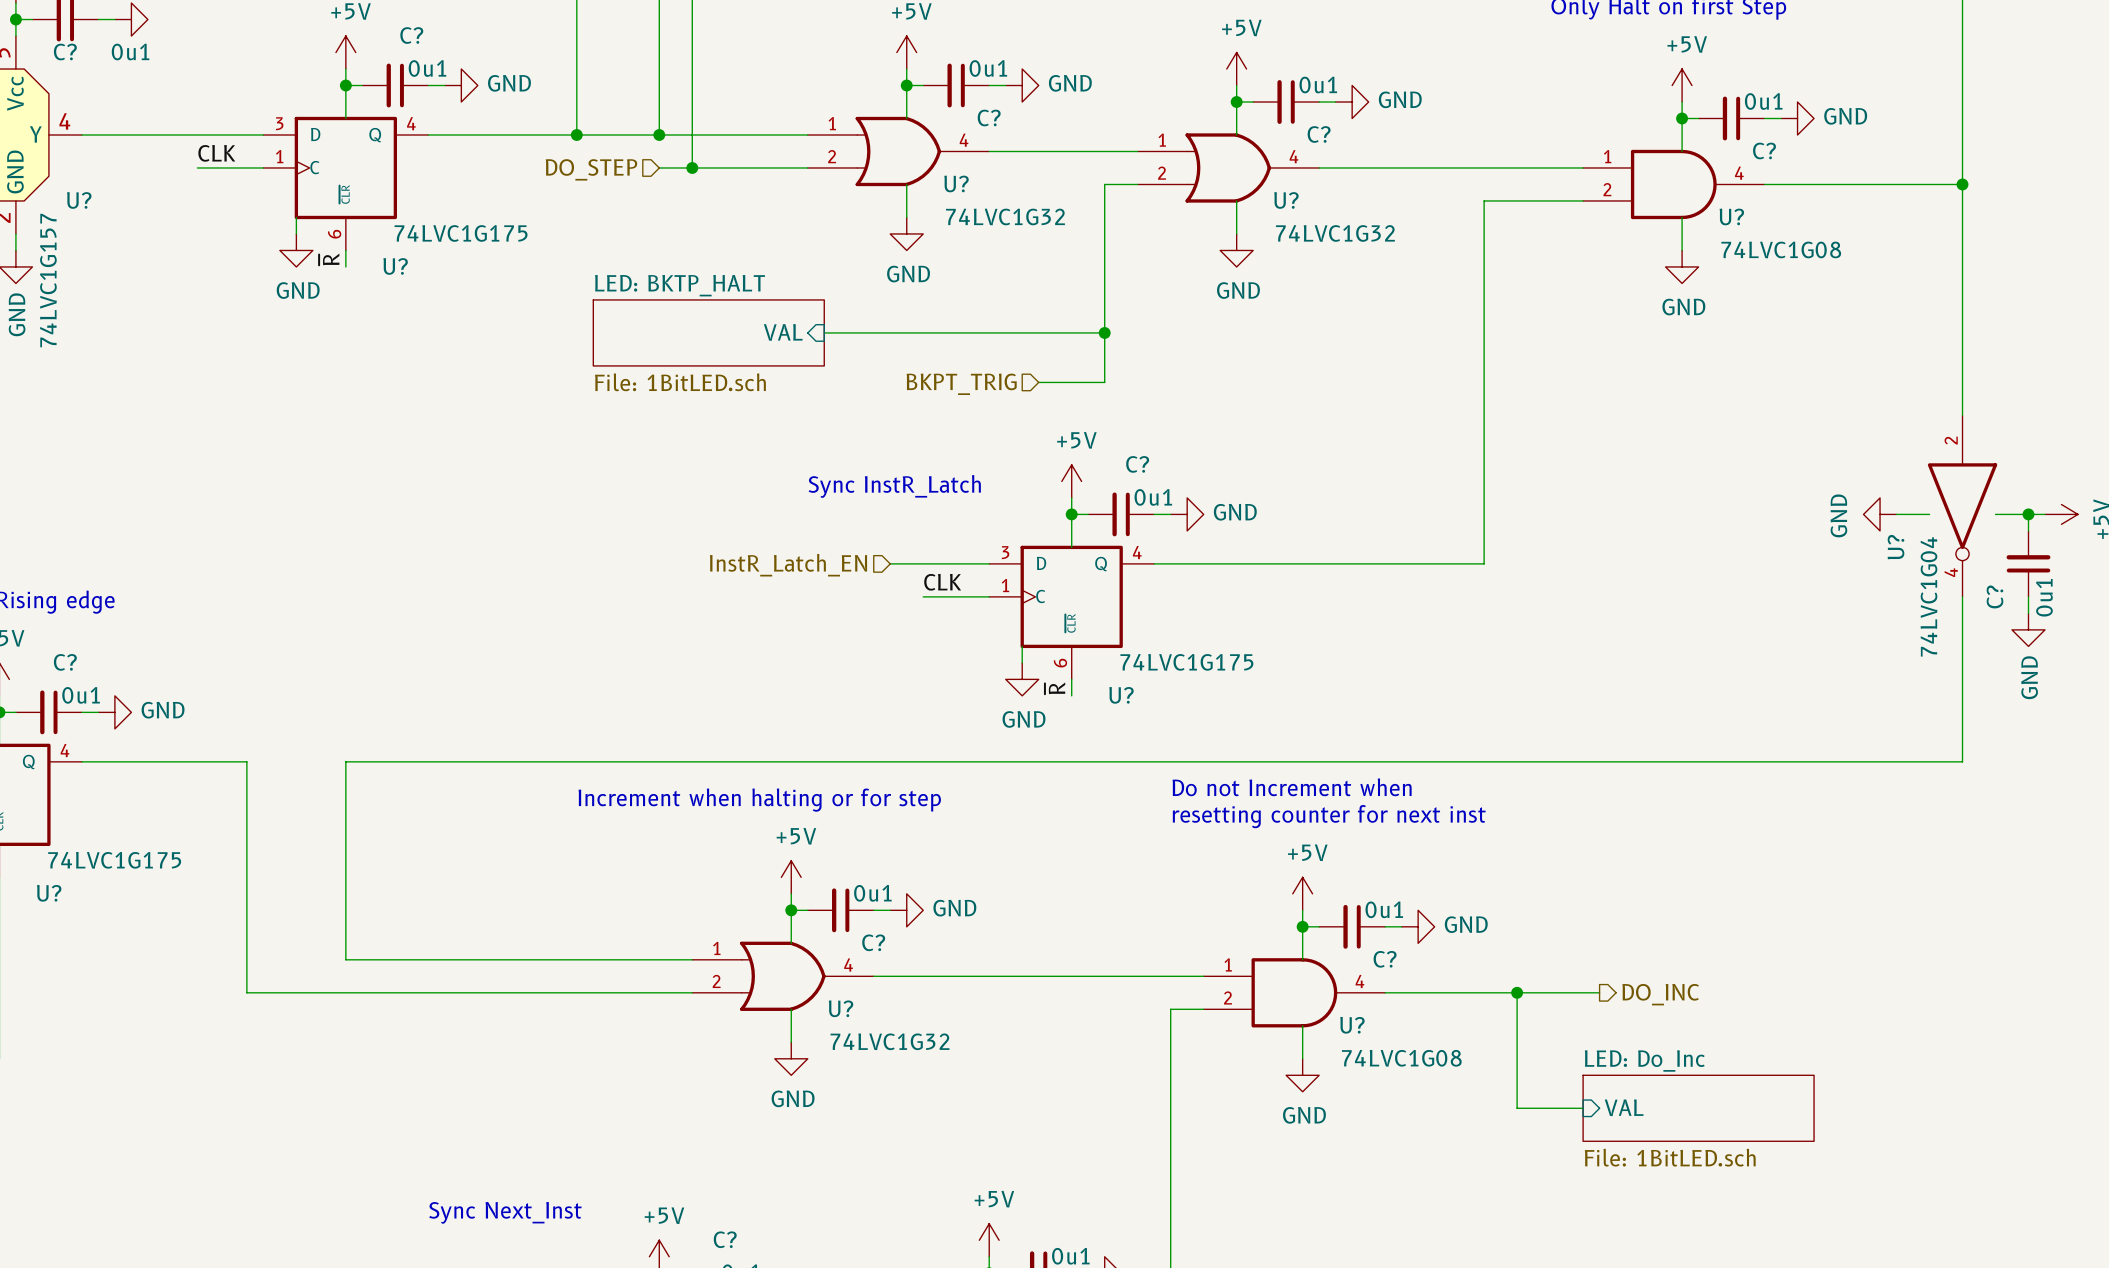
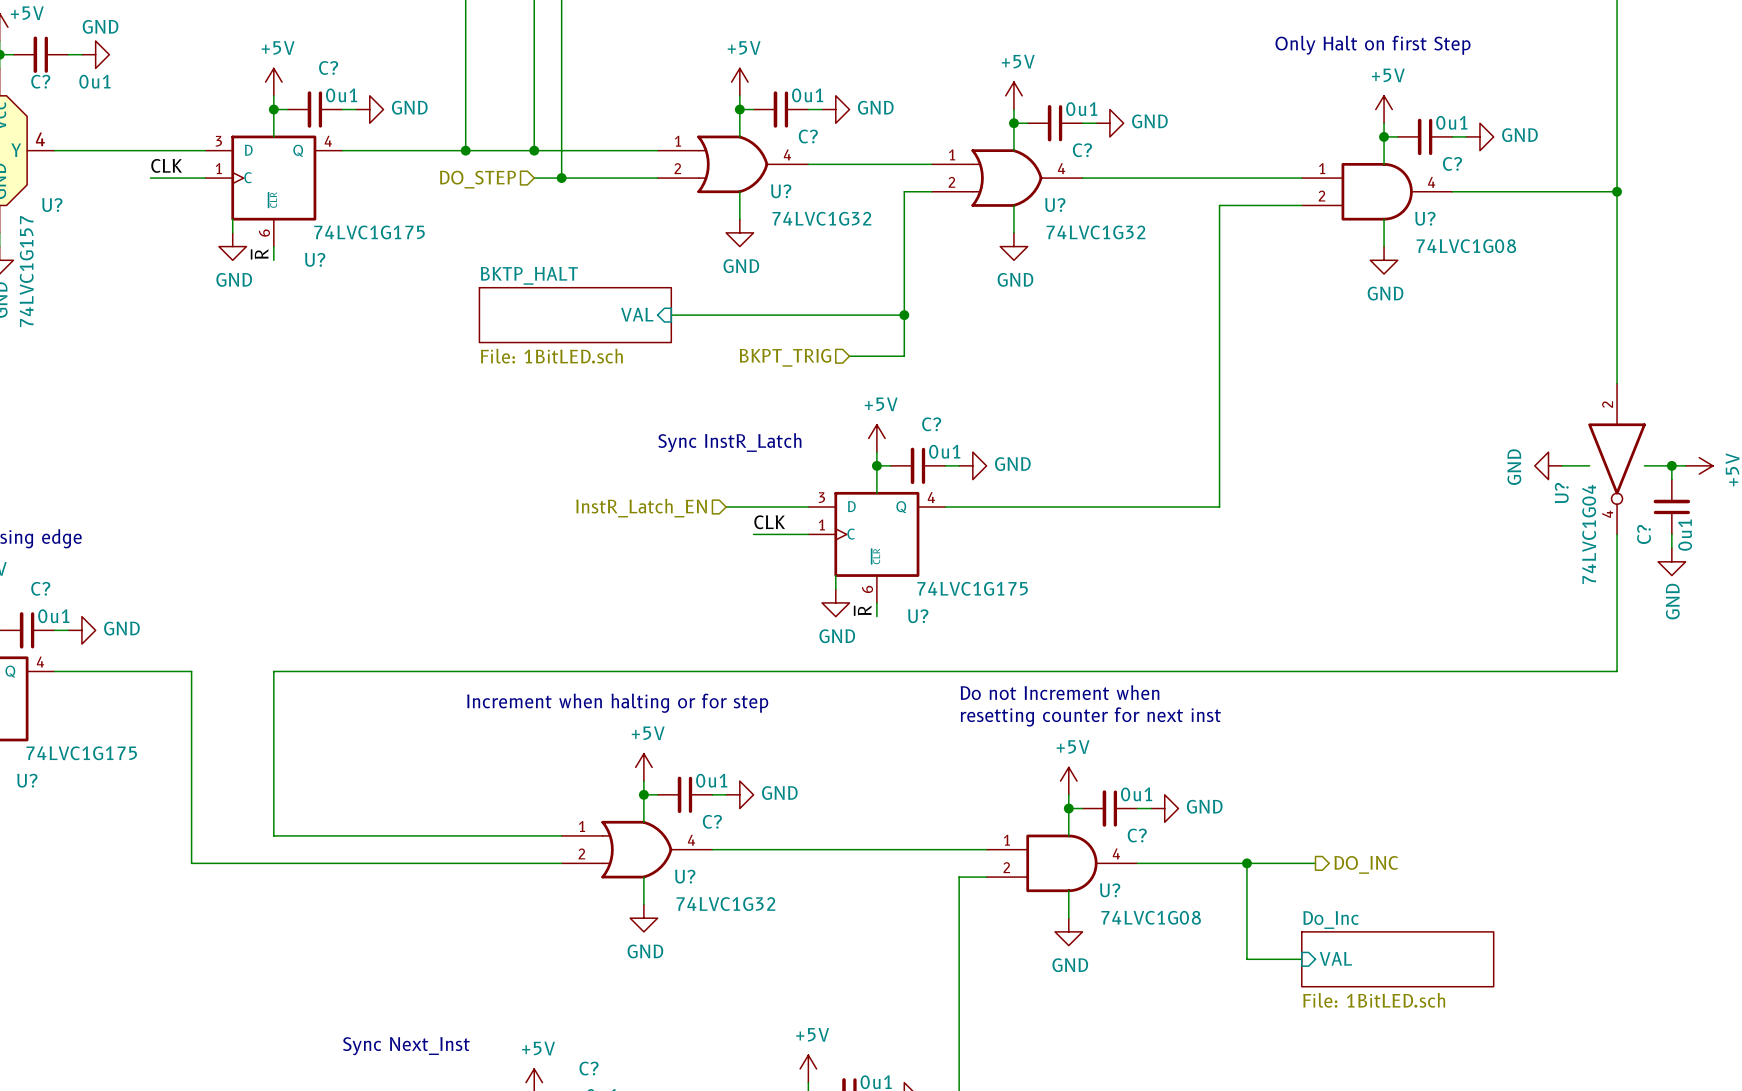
sheet BKTP_HALT name: LED: BKTP_HALT (679, 285) -> BKTP_HALT (529, 275)
sheet Do_Inc name: LED: Do_Inc (1644, 1061) -> Do_Inc (1330, 920)

